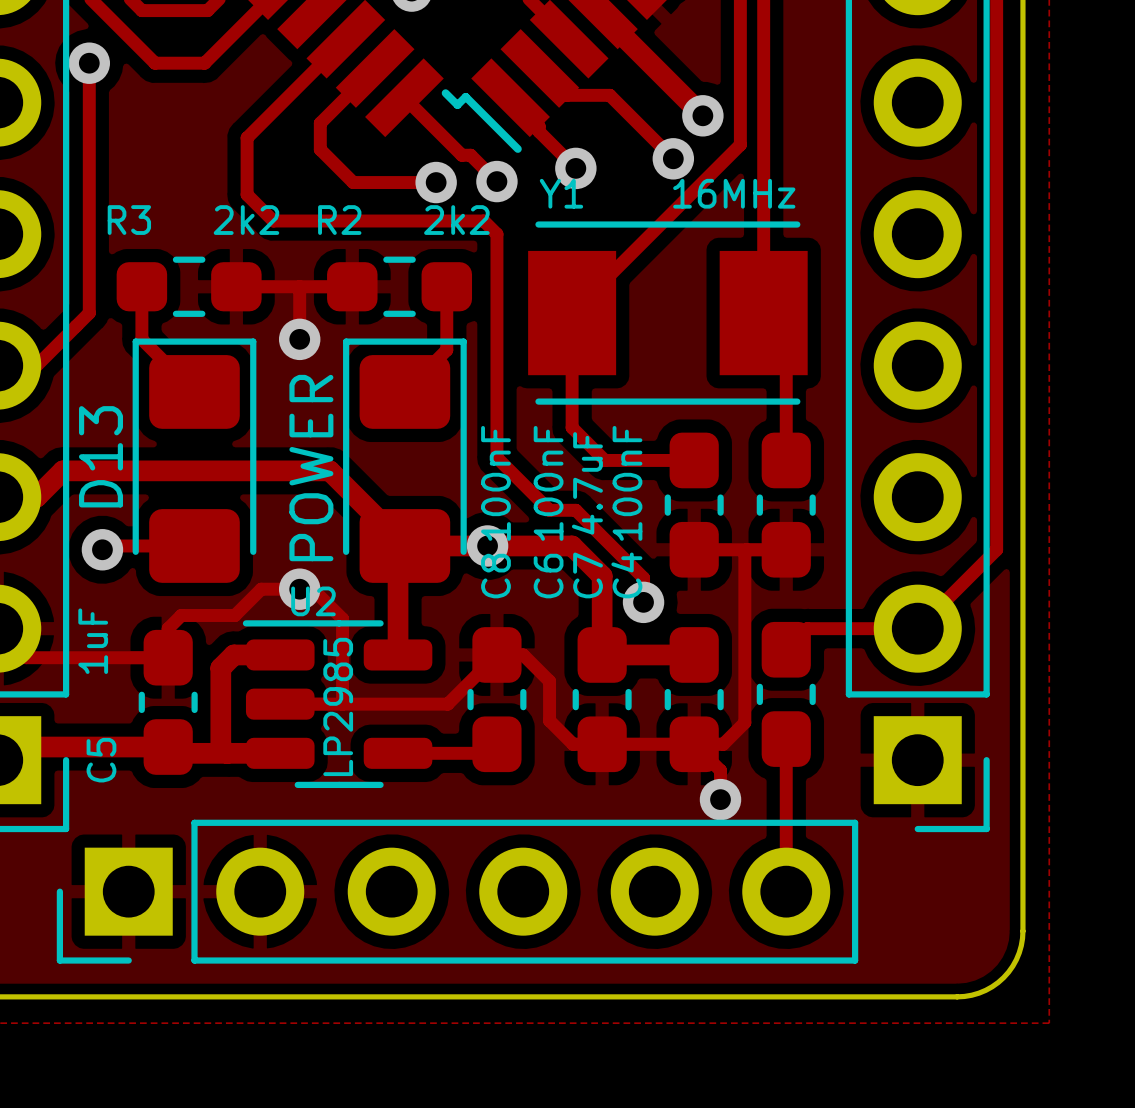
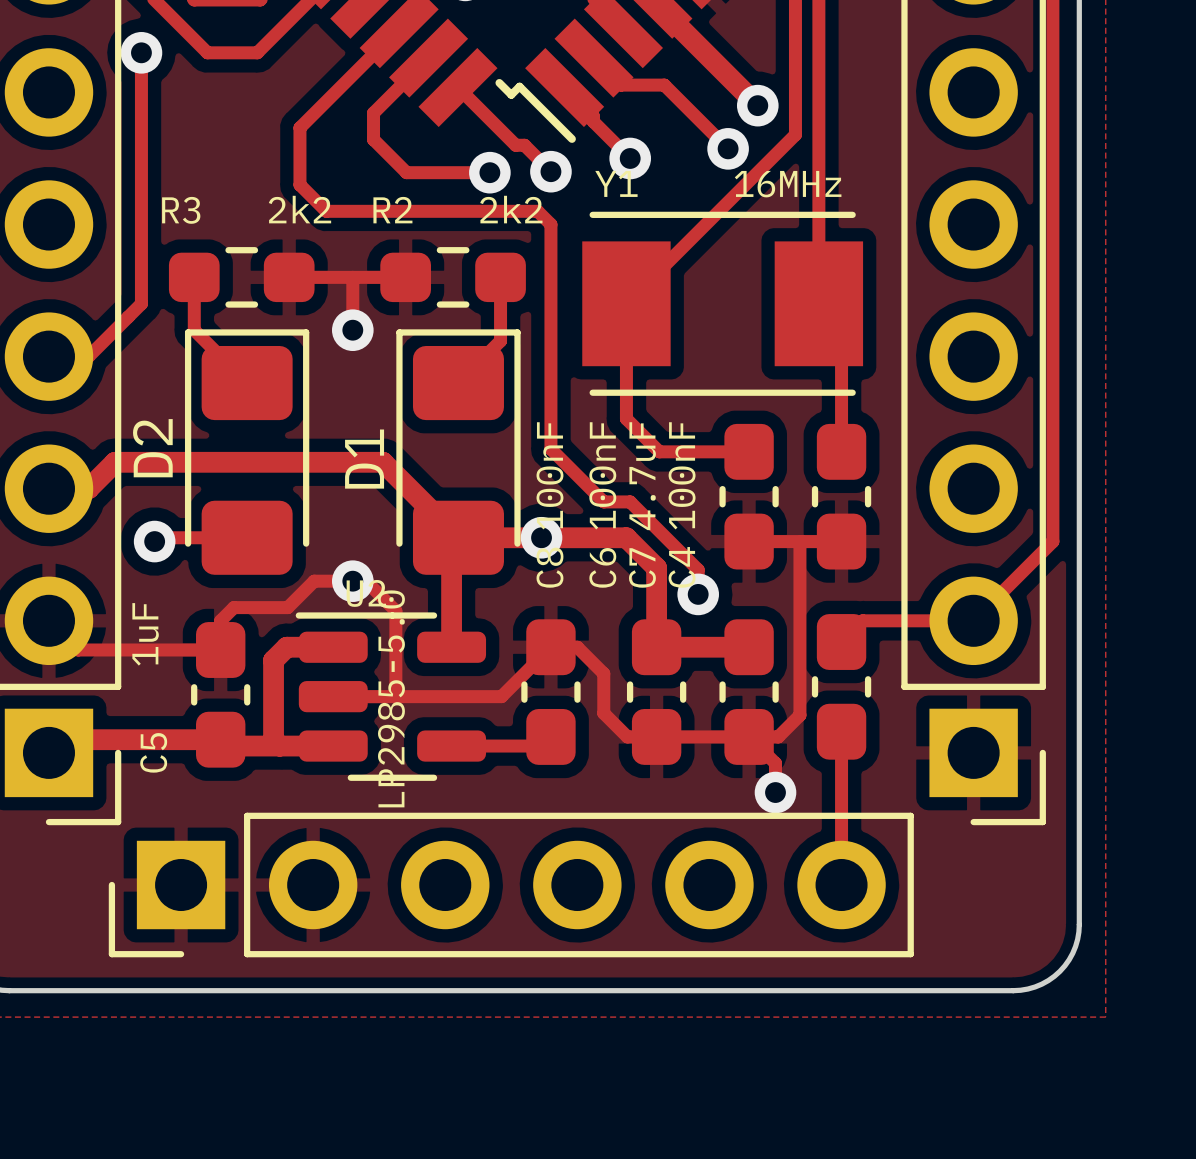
D13 name: D13 (100, 456) -> D2 (152, 448)
POWER name: POWER (311, 468) -> D1 (364, 459)
U2 value: LP2985 (338, 706) -> LP2985-5.0 (391, 698)

